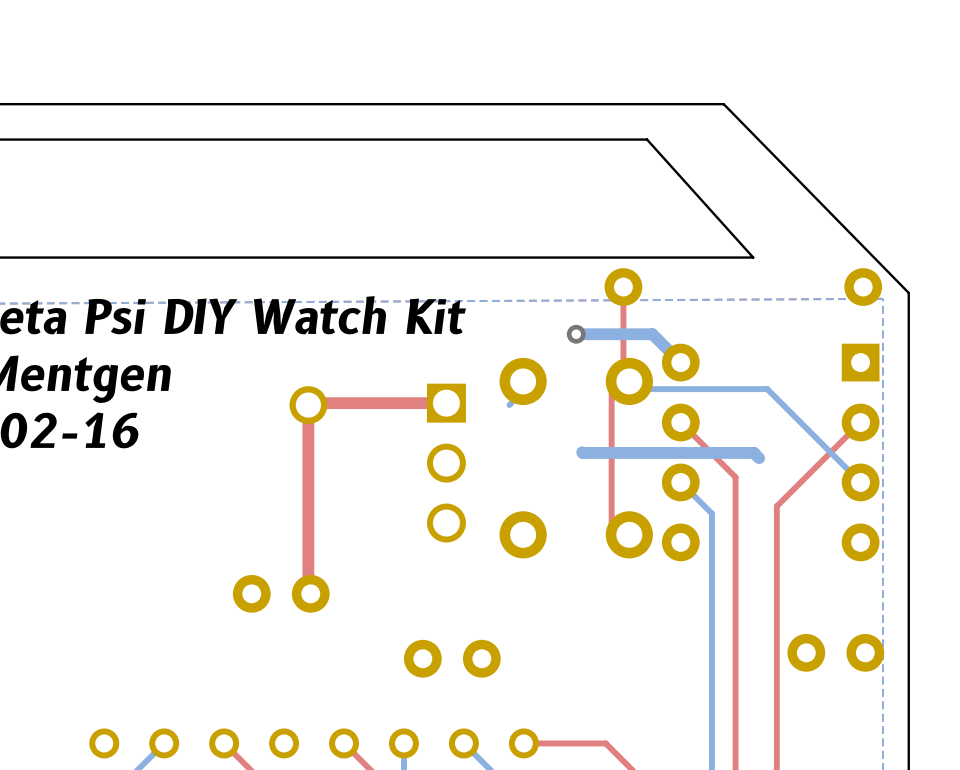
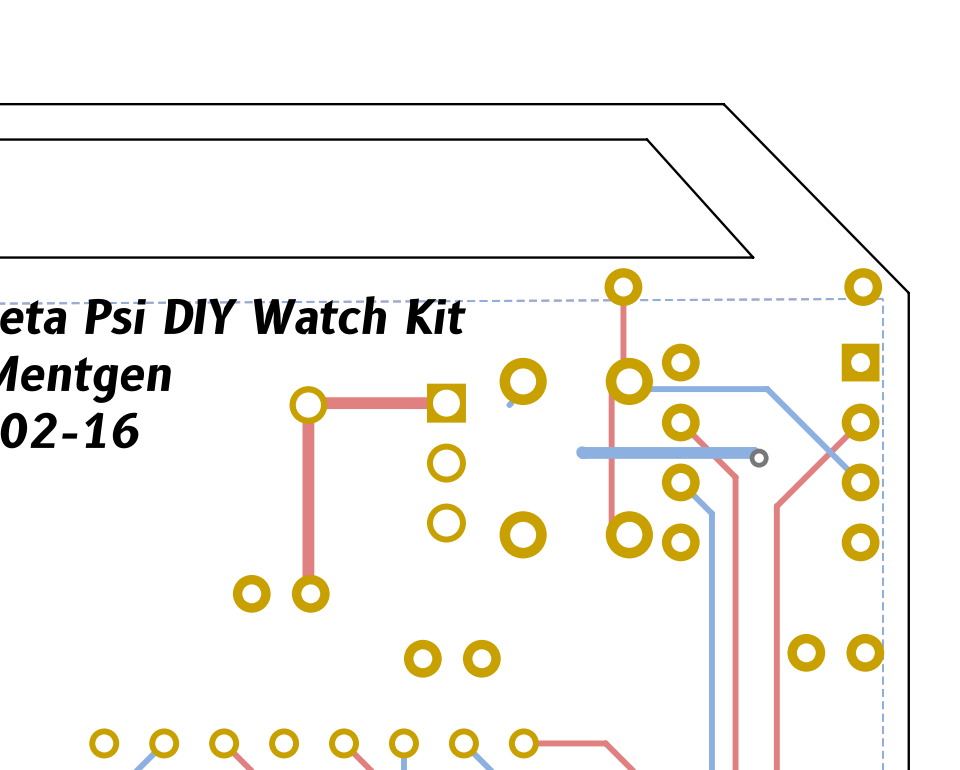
bottom track: (576, 334) (652, 334) (680, 362) -> none
via: (576, 334) -> none
via: none -> (759, 458)

